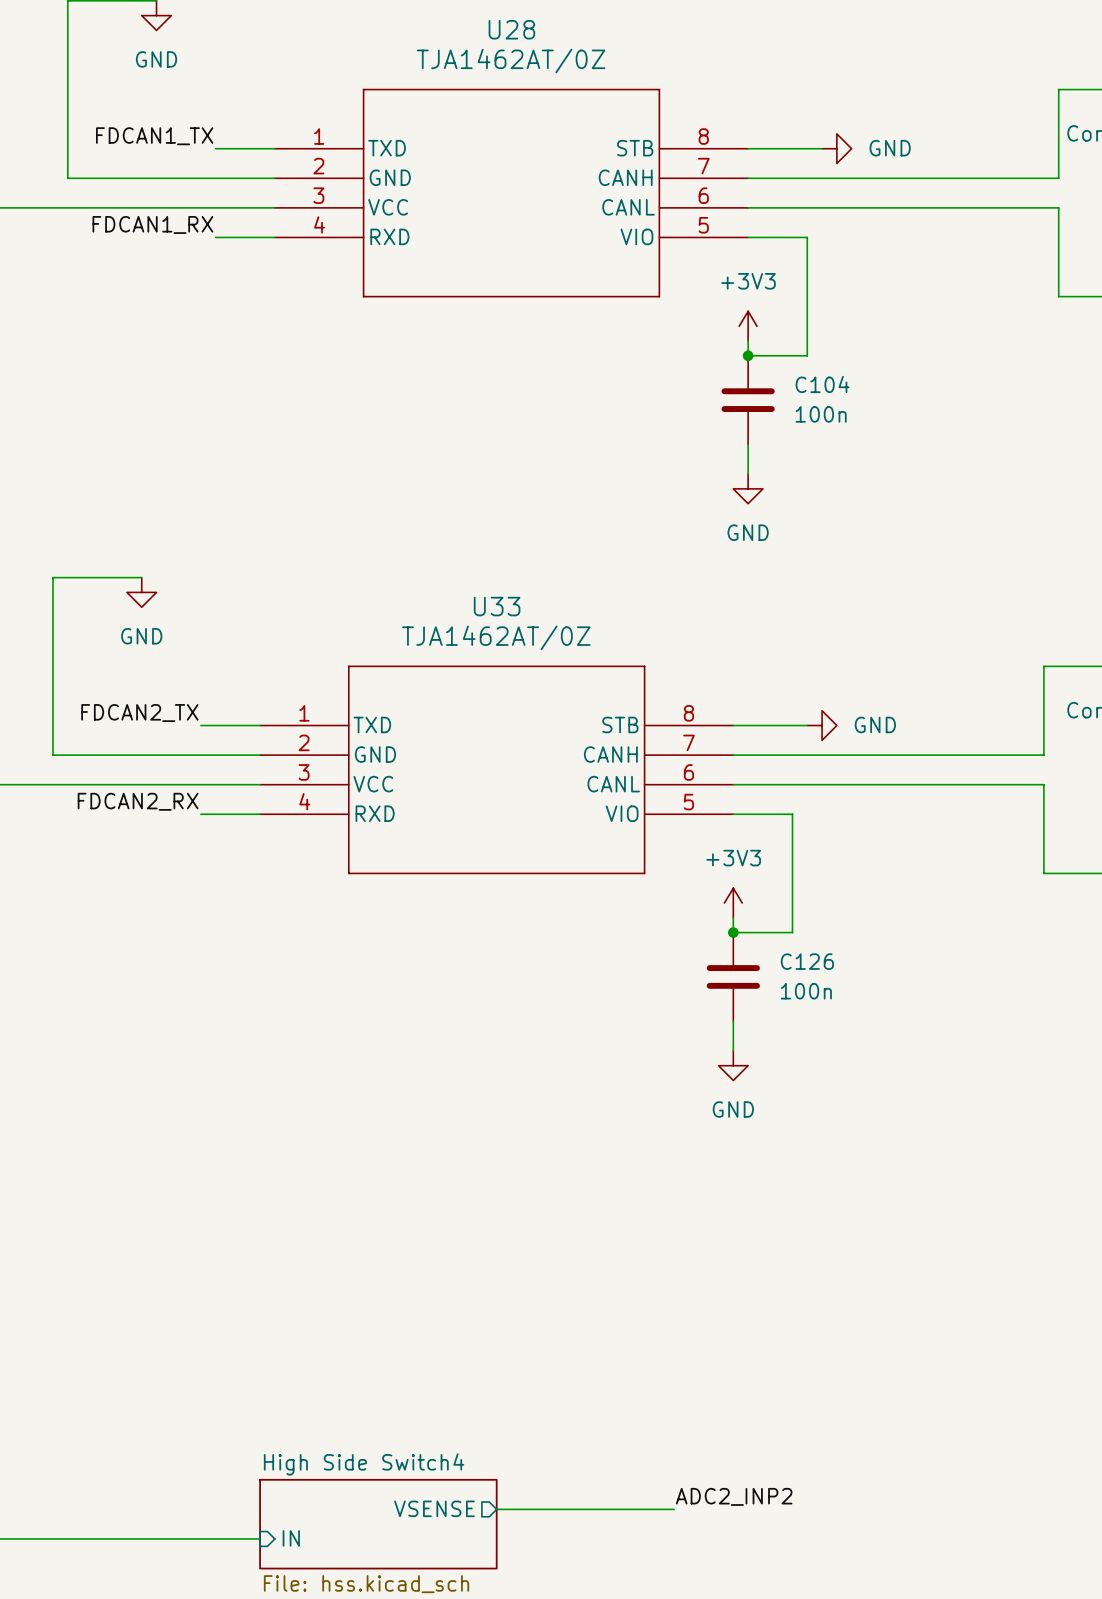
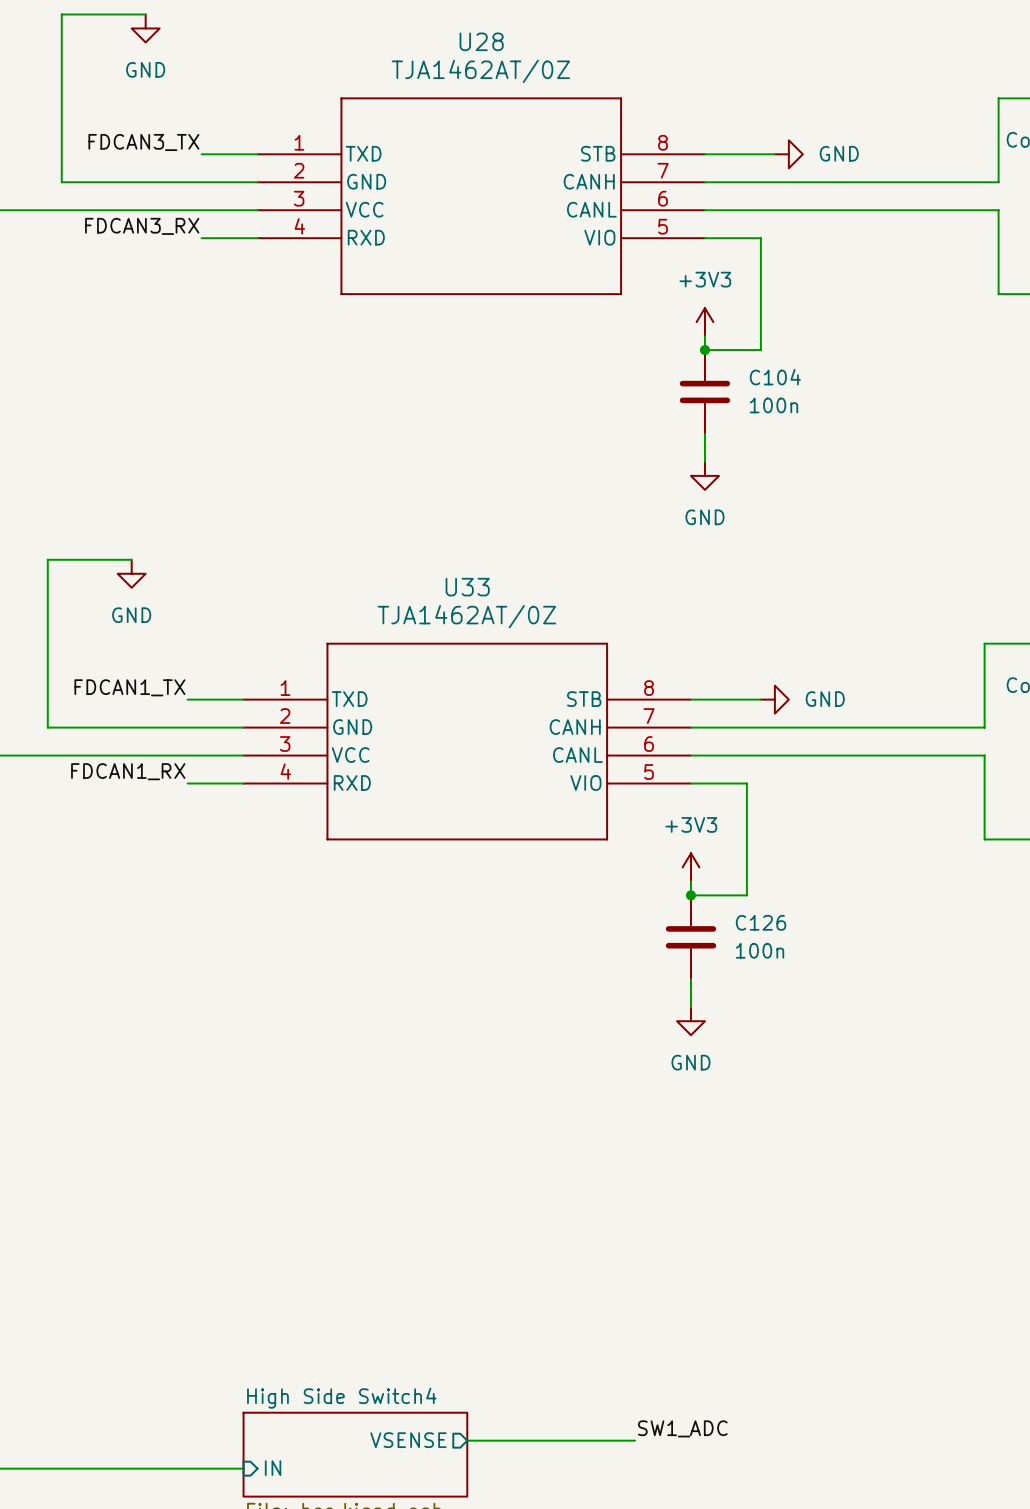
label: FDCAN1_TX (154, 136) -> FDCAN3_TX (143, 142)
label: FDCAN1_RX (152, 224) -> FDCAN3_RX (142, 226)
label: FDCAN2_TX (139, 713) -> FDCAN1_TX (129, 687)
label: FDCAN2_RX (138, 801) -> FDCAN1_RX (128, 771)
label: ADC2_INP2 (734, 1496) -> SW1_ADC (682, 1428)

